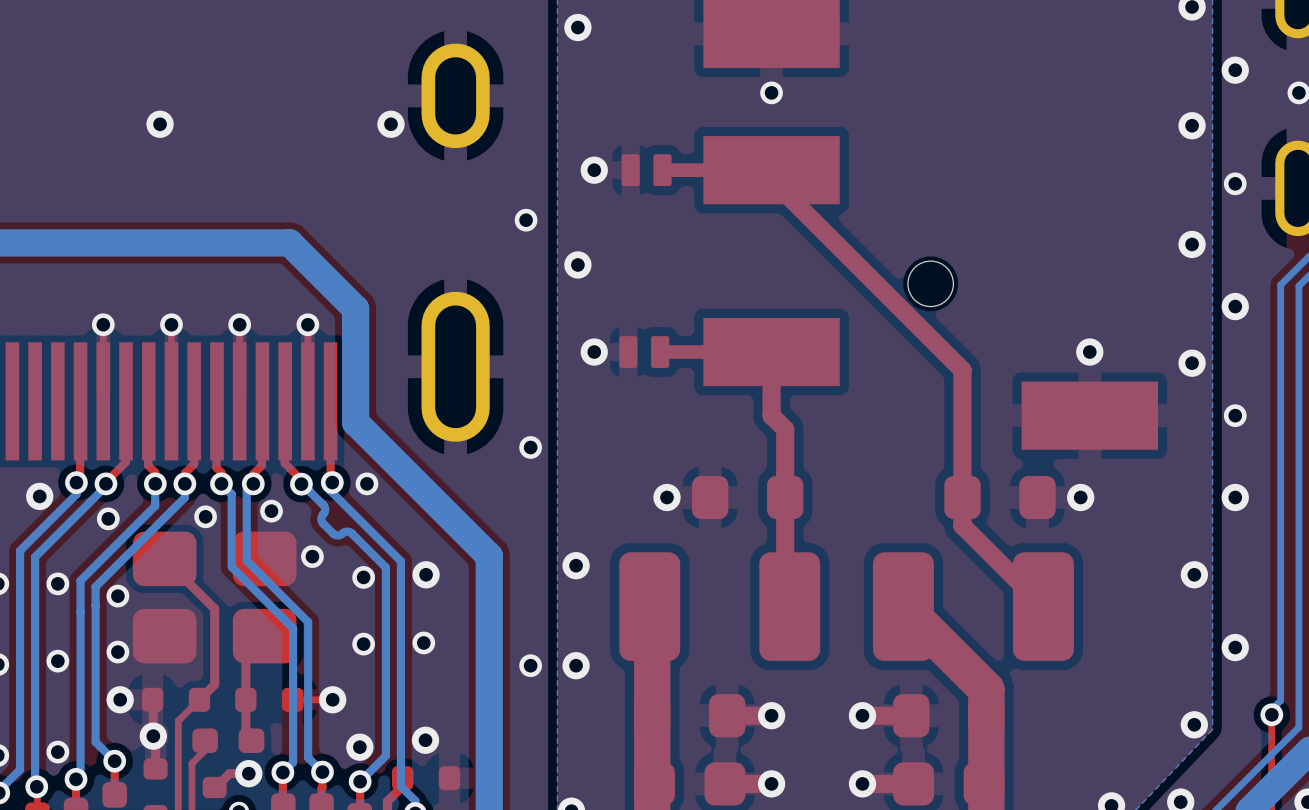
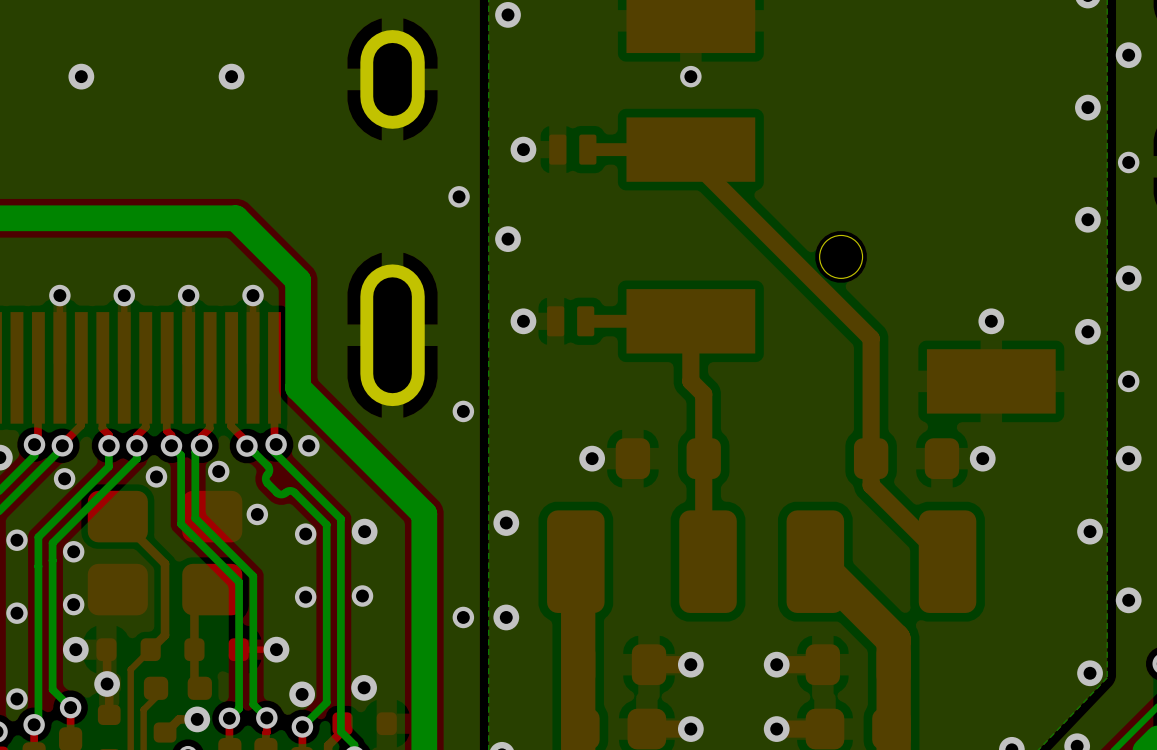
via: none -> (231, 76)
via position: (160, 124) -> (81, 76)
via: (390, 124) -> none

